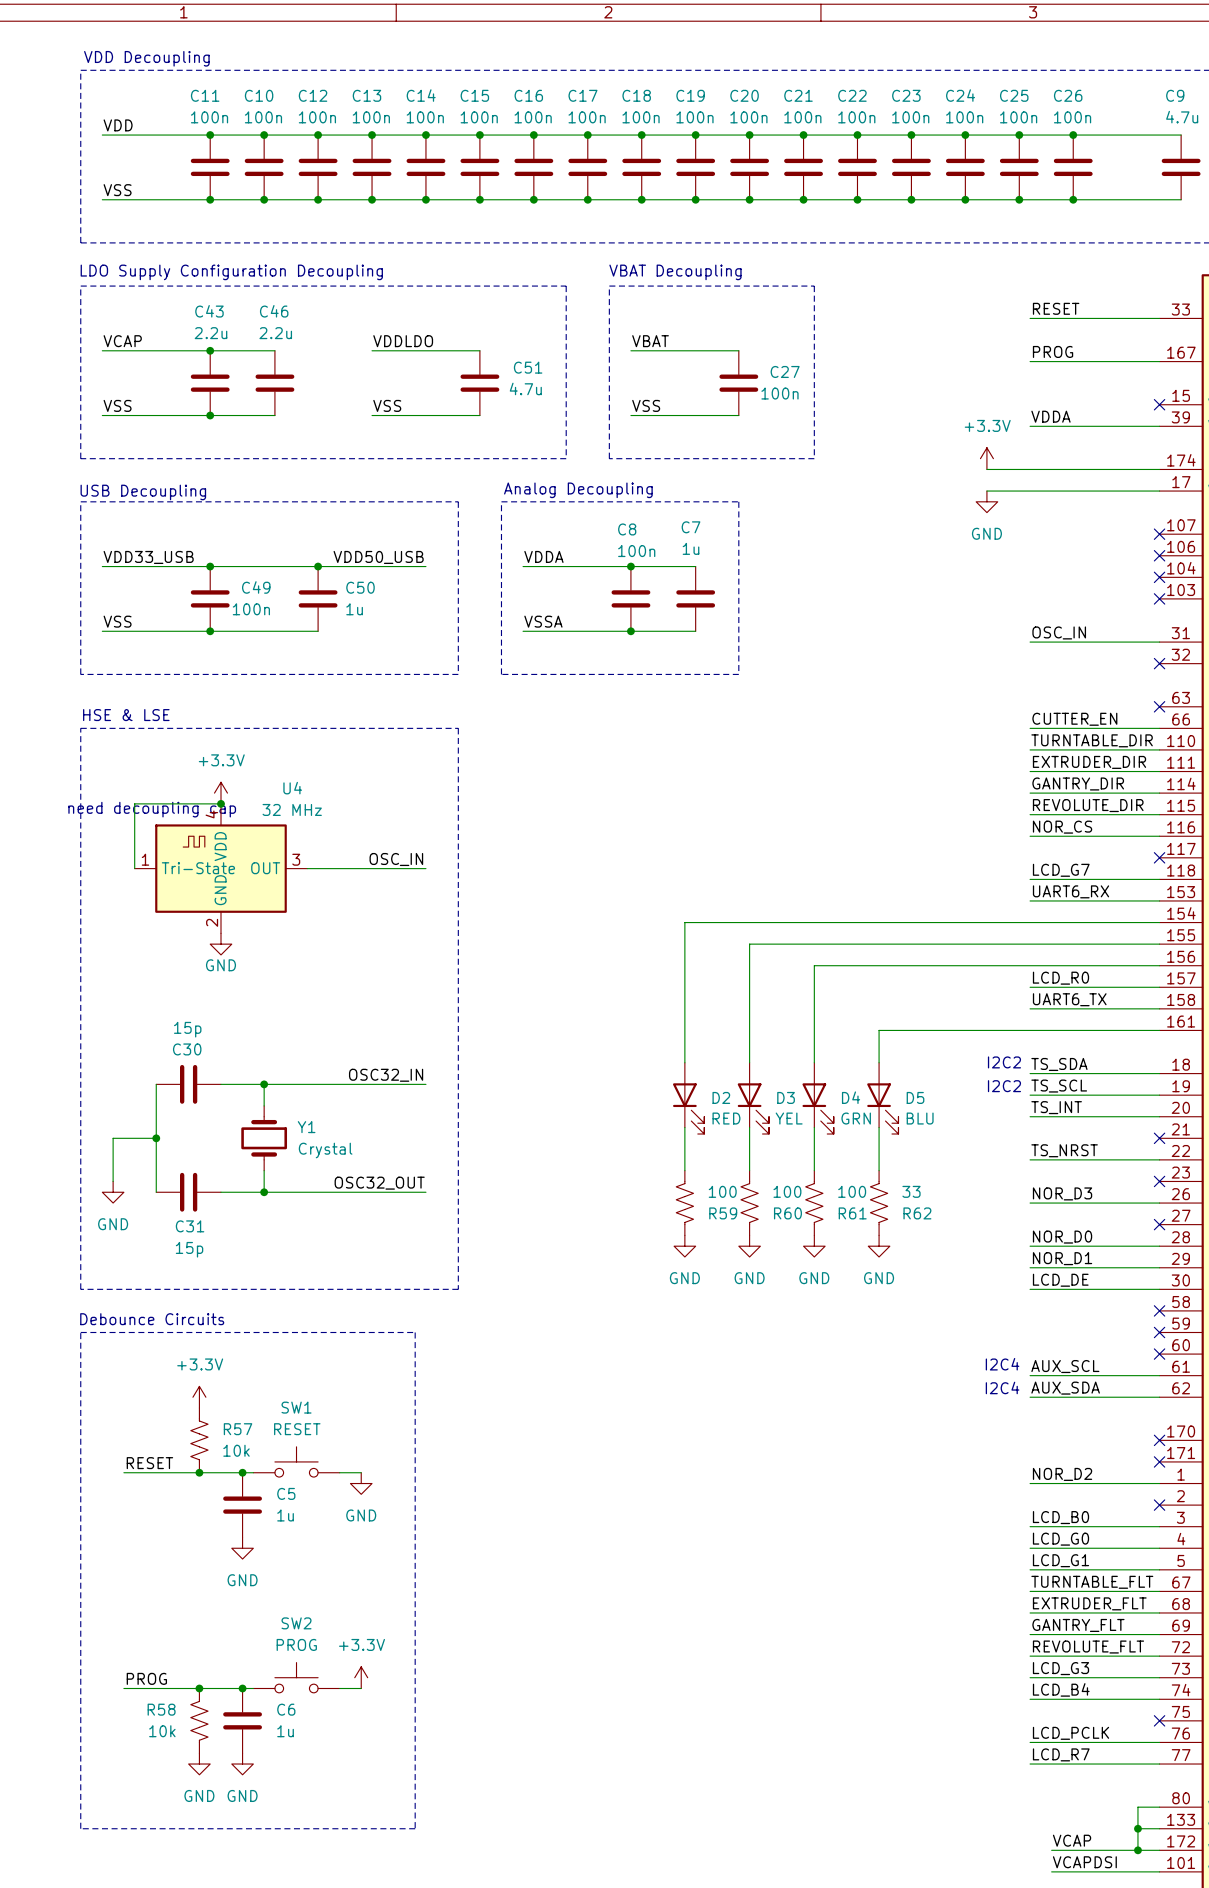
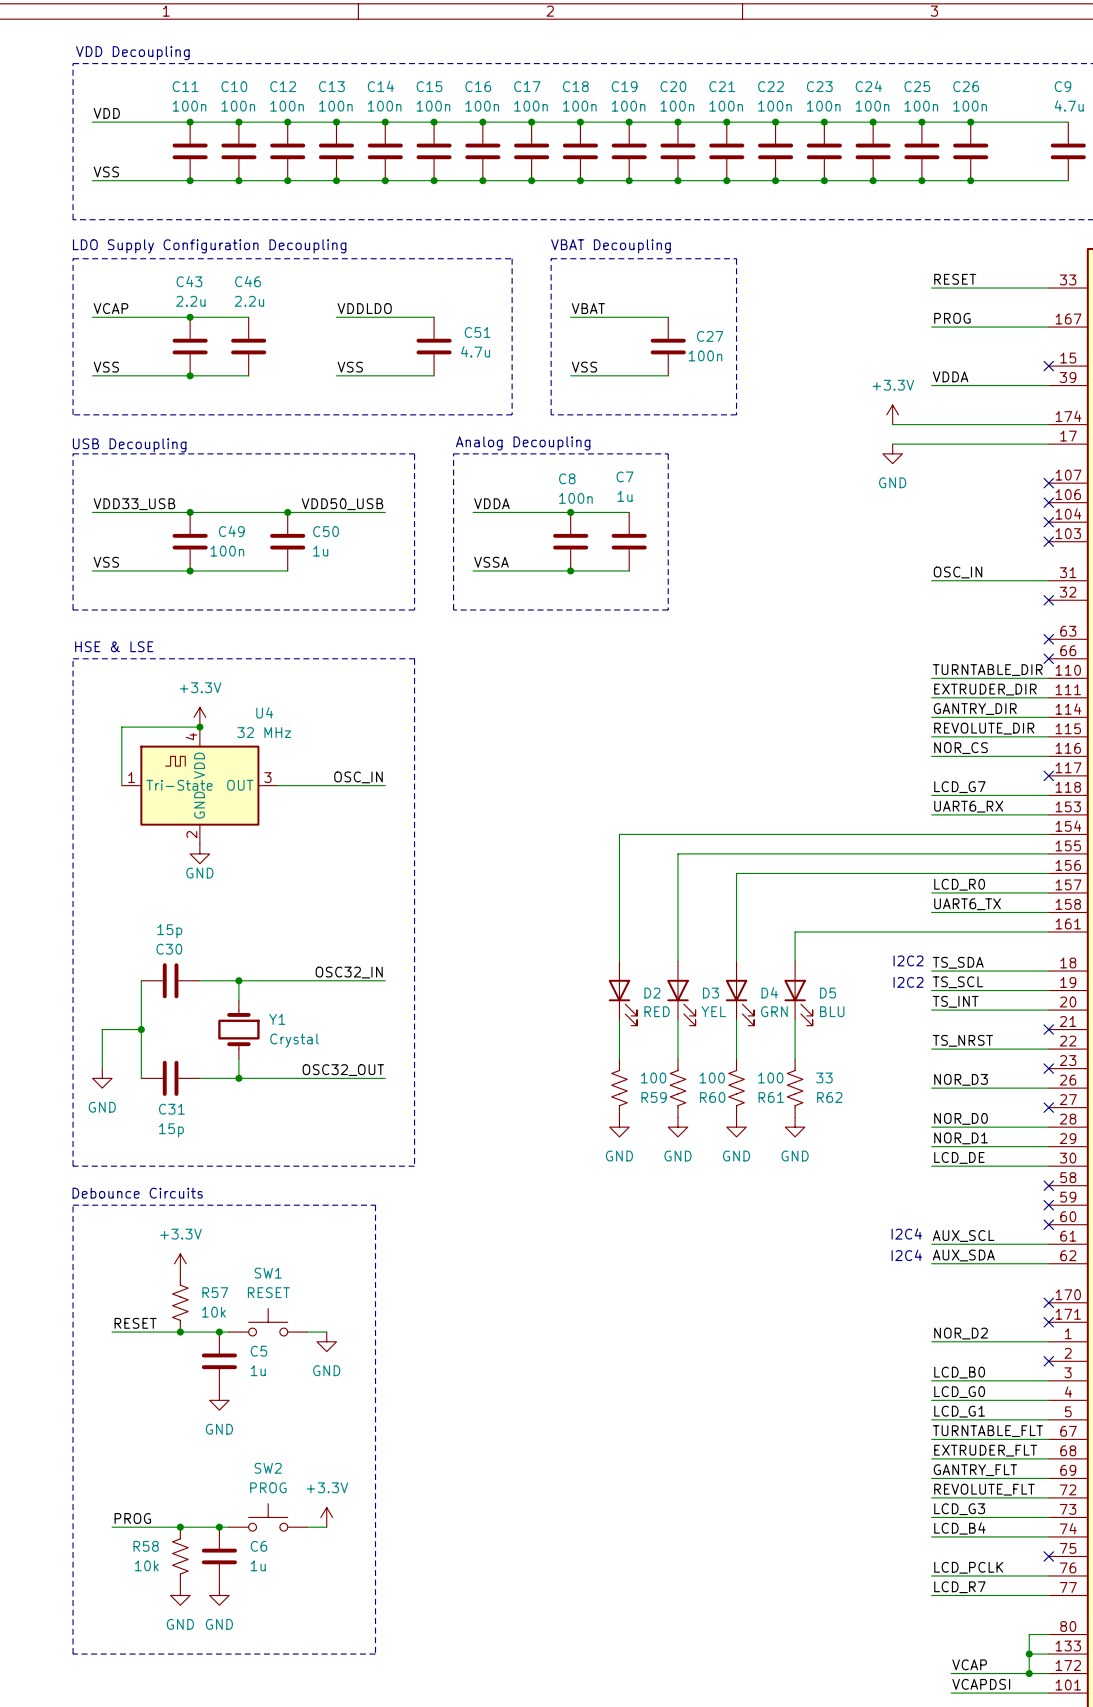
label: CUTTER_EN (1074, 719) -> none
wire: (1030, 728) (1159, 728) -> none
no-connect mark: none -> (1048, 658)
text: need decoupling cap (152, 809) -> none

